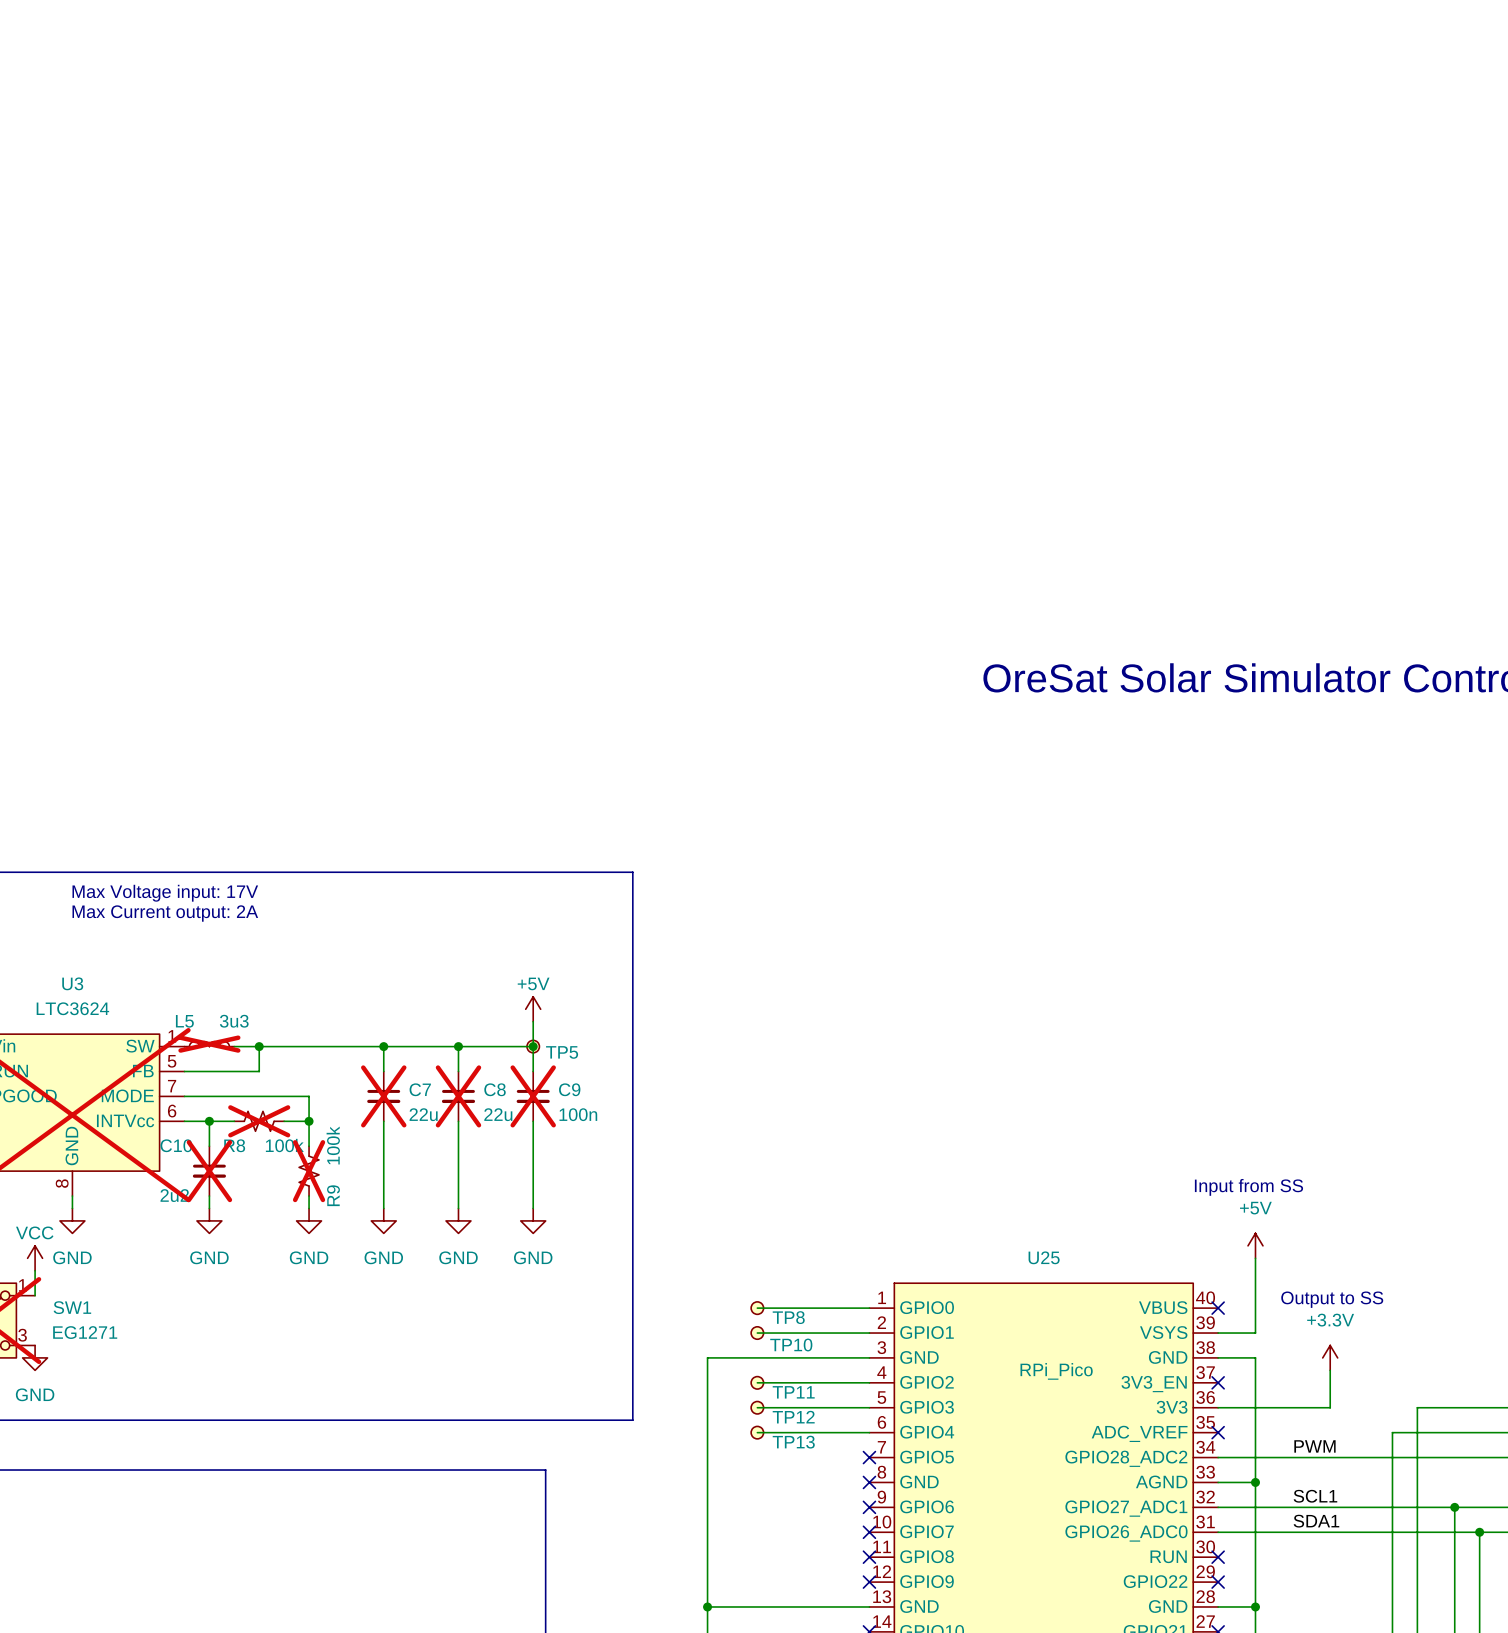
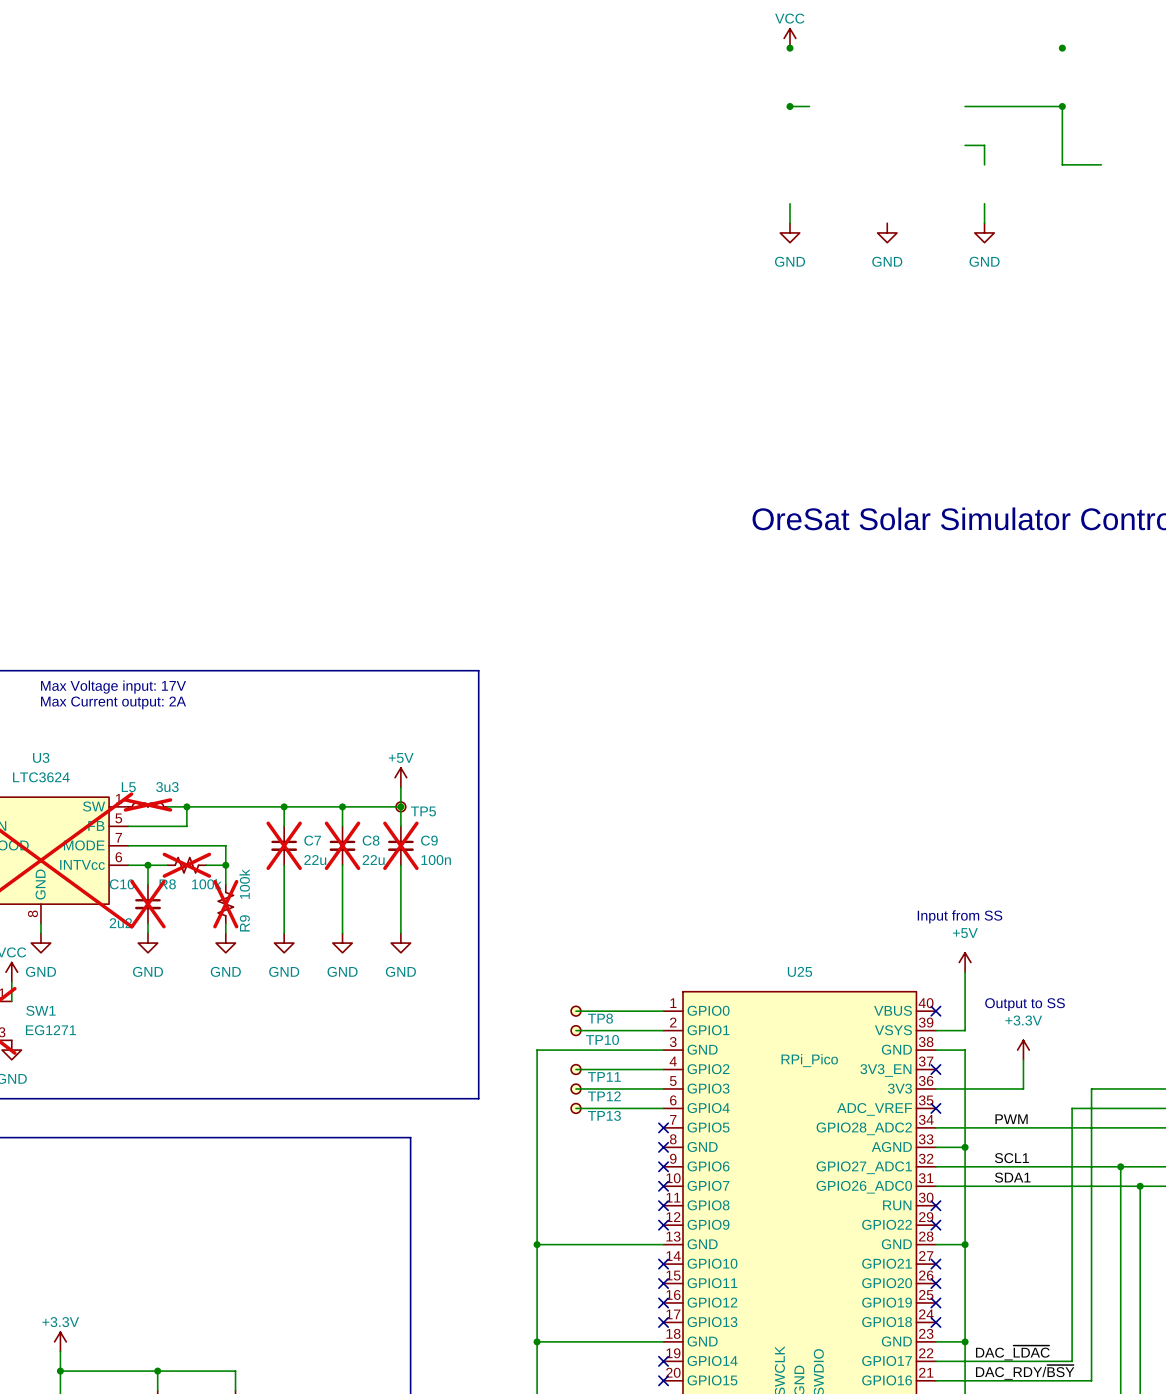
power symbol: none -> VCC (789, 38)
junction: none -> (789, 48)
junction: none -> (1062, 48)
wire: none -> (789, 106) (809, 106)
junction: none -> (789, 106)
wire: none -> (965, 106) (1062, 106) (1062, 164) (1101, 164)
junction: none -> (1062, 106)
wire: none -> (965, 145) (984, 145) (984, 164)
wire: none -> (789, 203) (789, 223)
wire: none -> (984, 203) (984, 223)
power symbol: none -> GND (789, 232)
power symbol: none -> GND (887, 232)
power symbol: none -> GND (984, 232)

